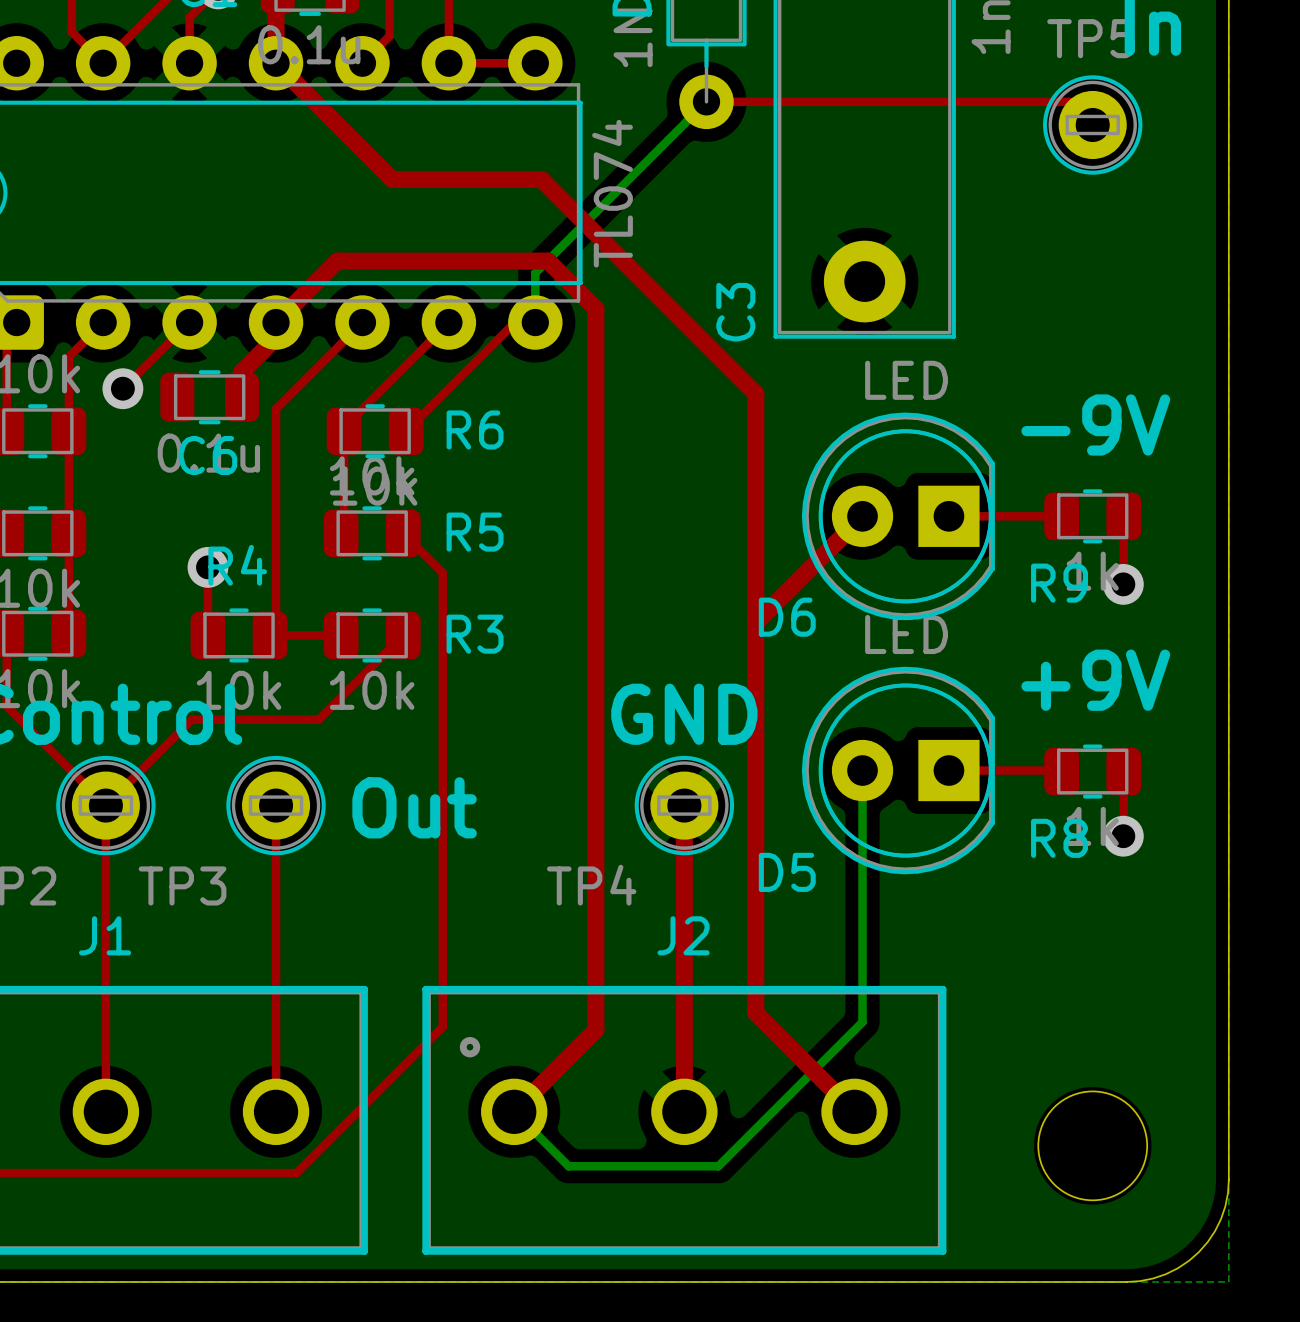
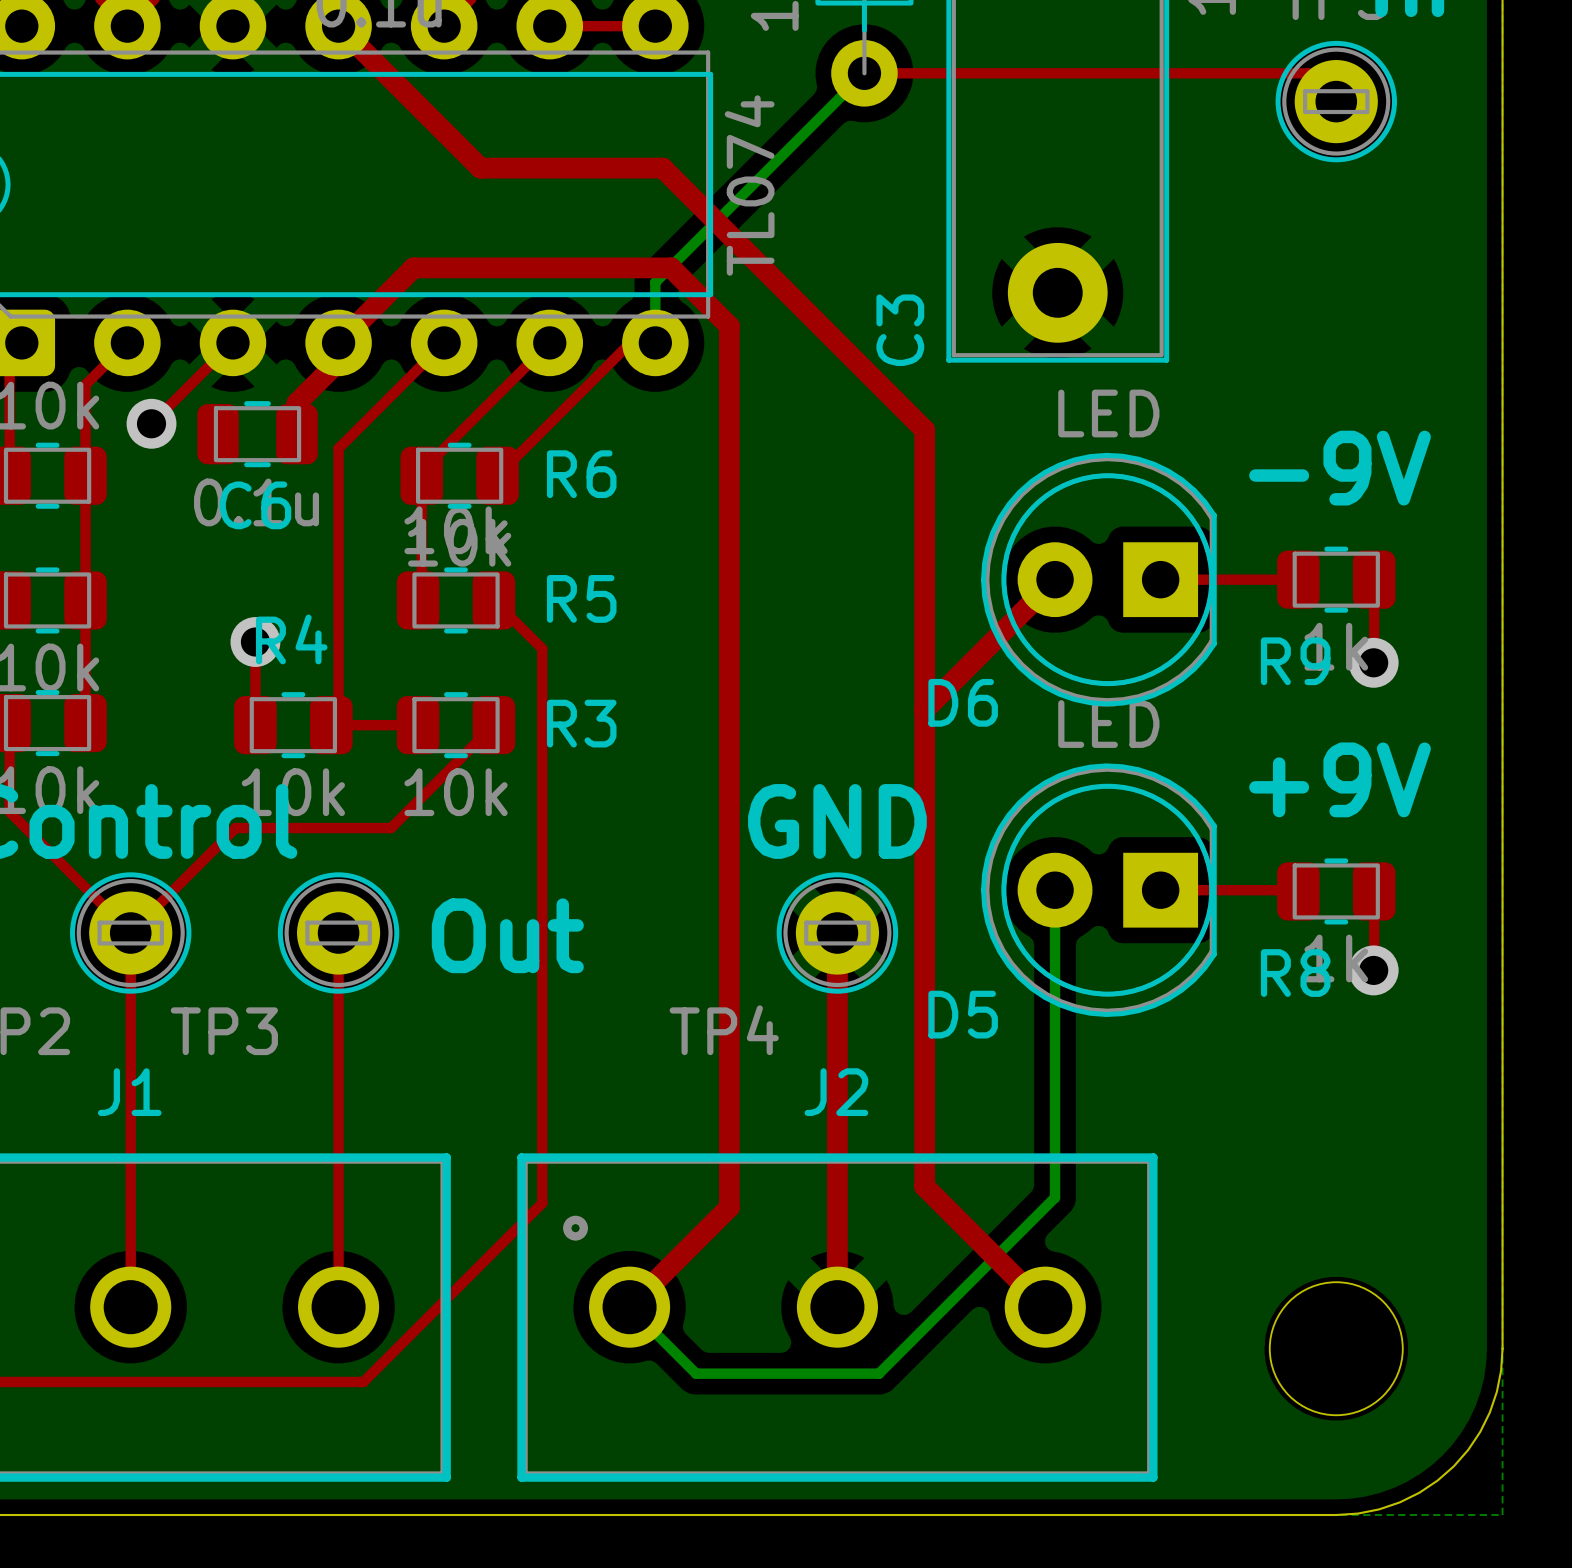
board edge: (1228, 1145) (1228, 1179) (1225, 1206) (1215, 1230) (1198, 1252) (1177, 1268) (1153, 1278) (1126, 1281) (1092, 1281) -> (1502, 1348) (1501, 1370) (1489, 1412) (1468, 1449) (1453, 1466) (1419, 1492) (1399, 1502) (1379, 1509) (1336, 1515)

